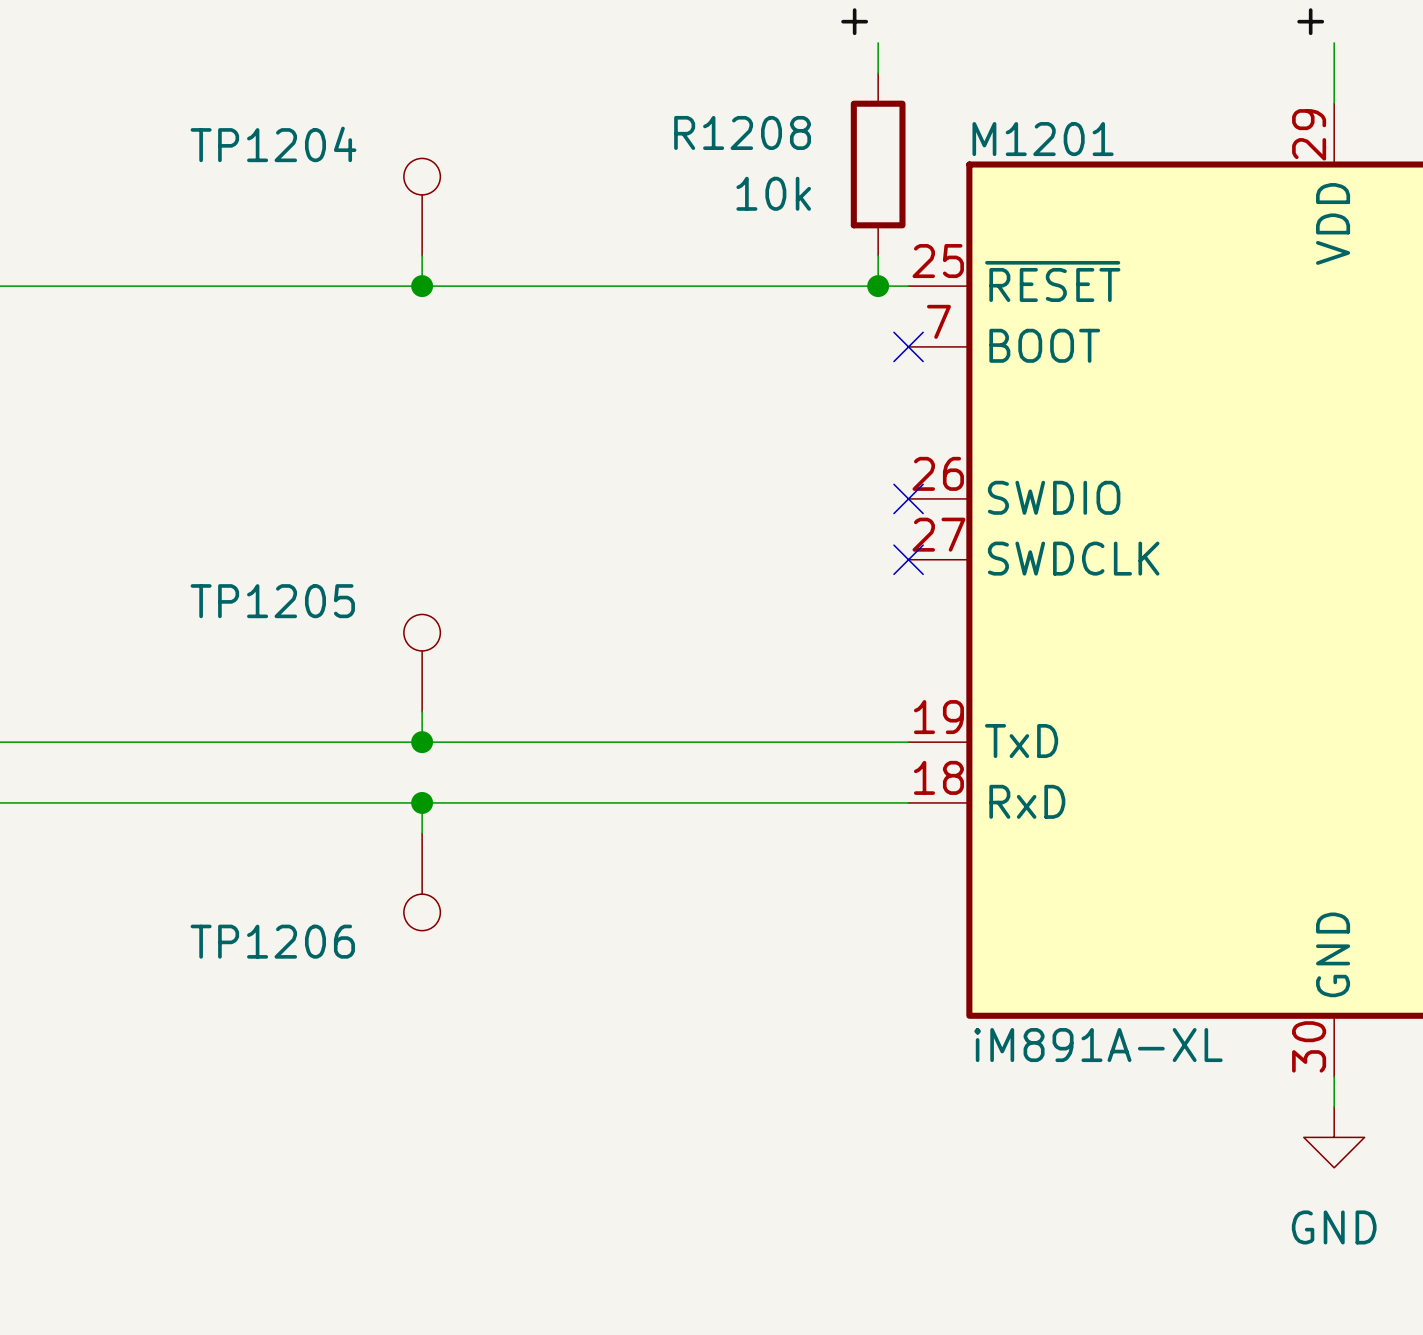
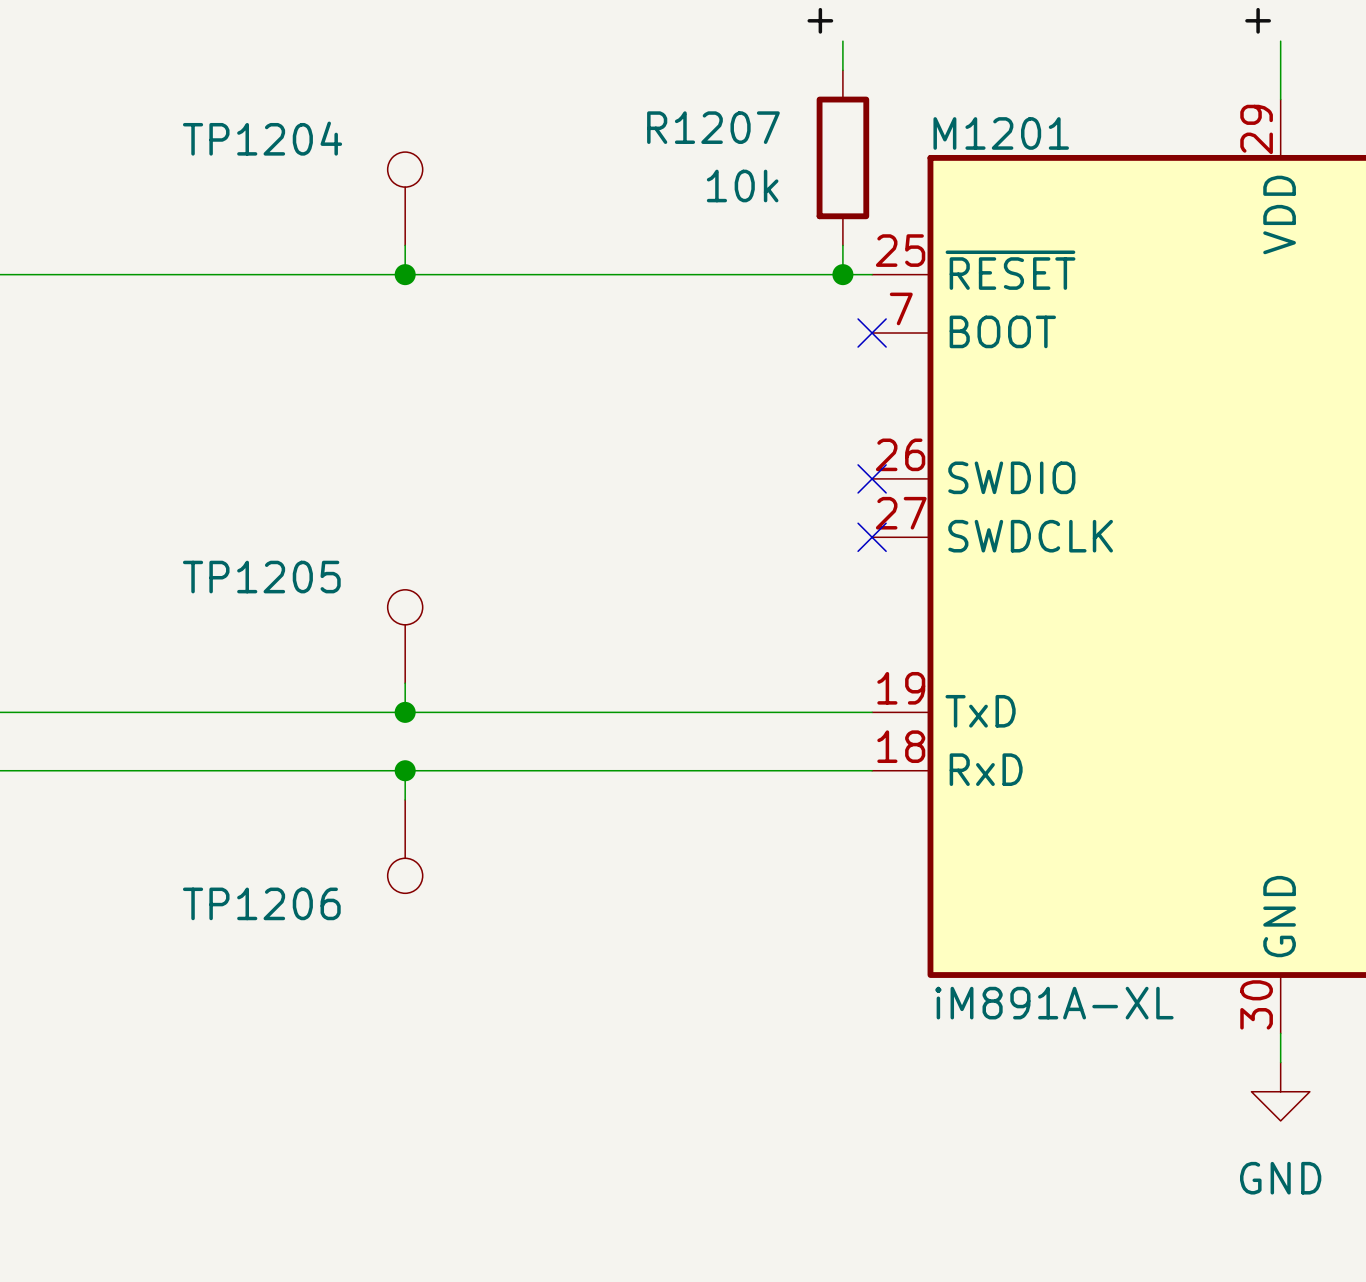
R1208 name: R1208 (742, 132) -> R1207 (713, 127)

